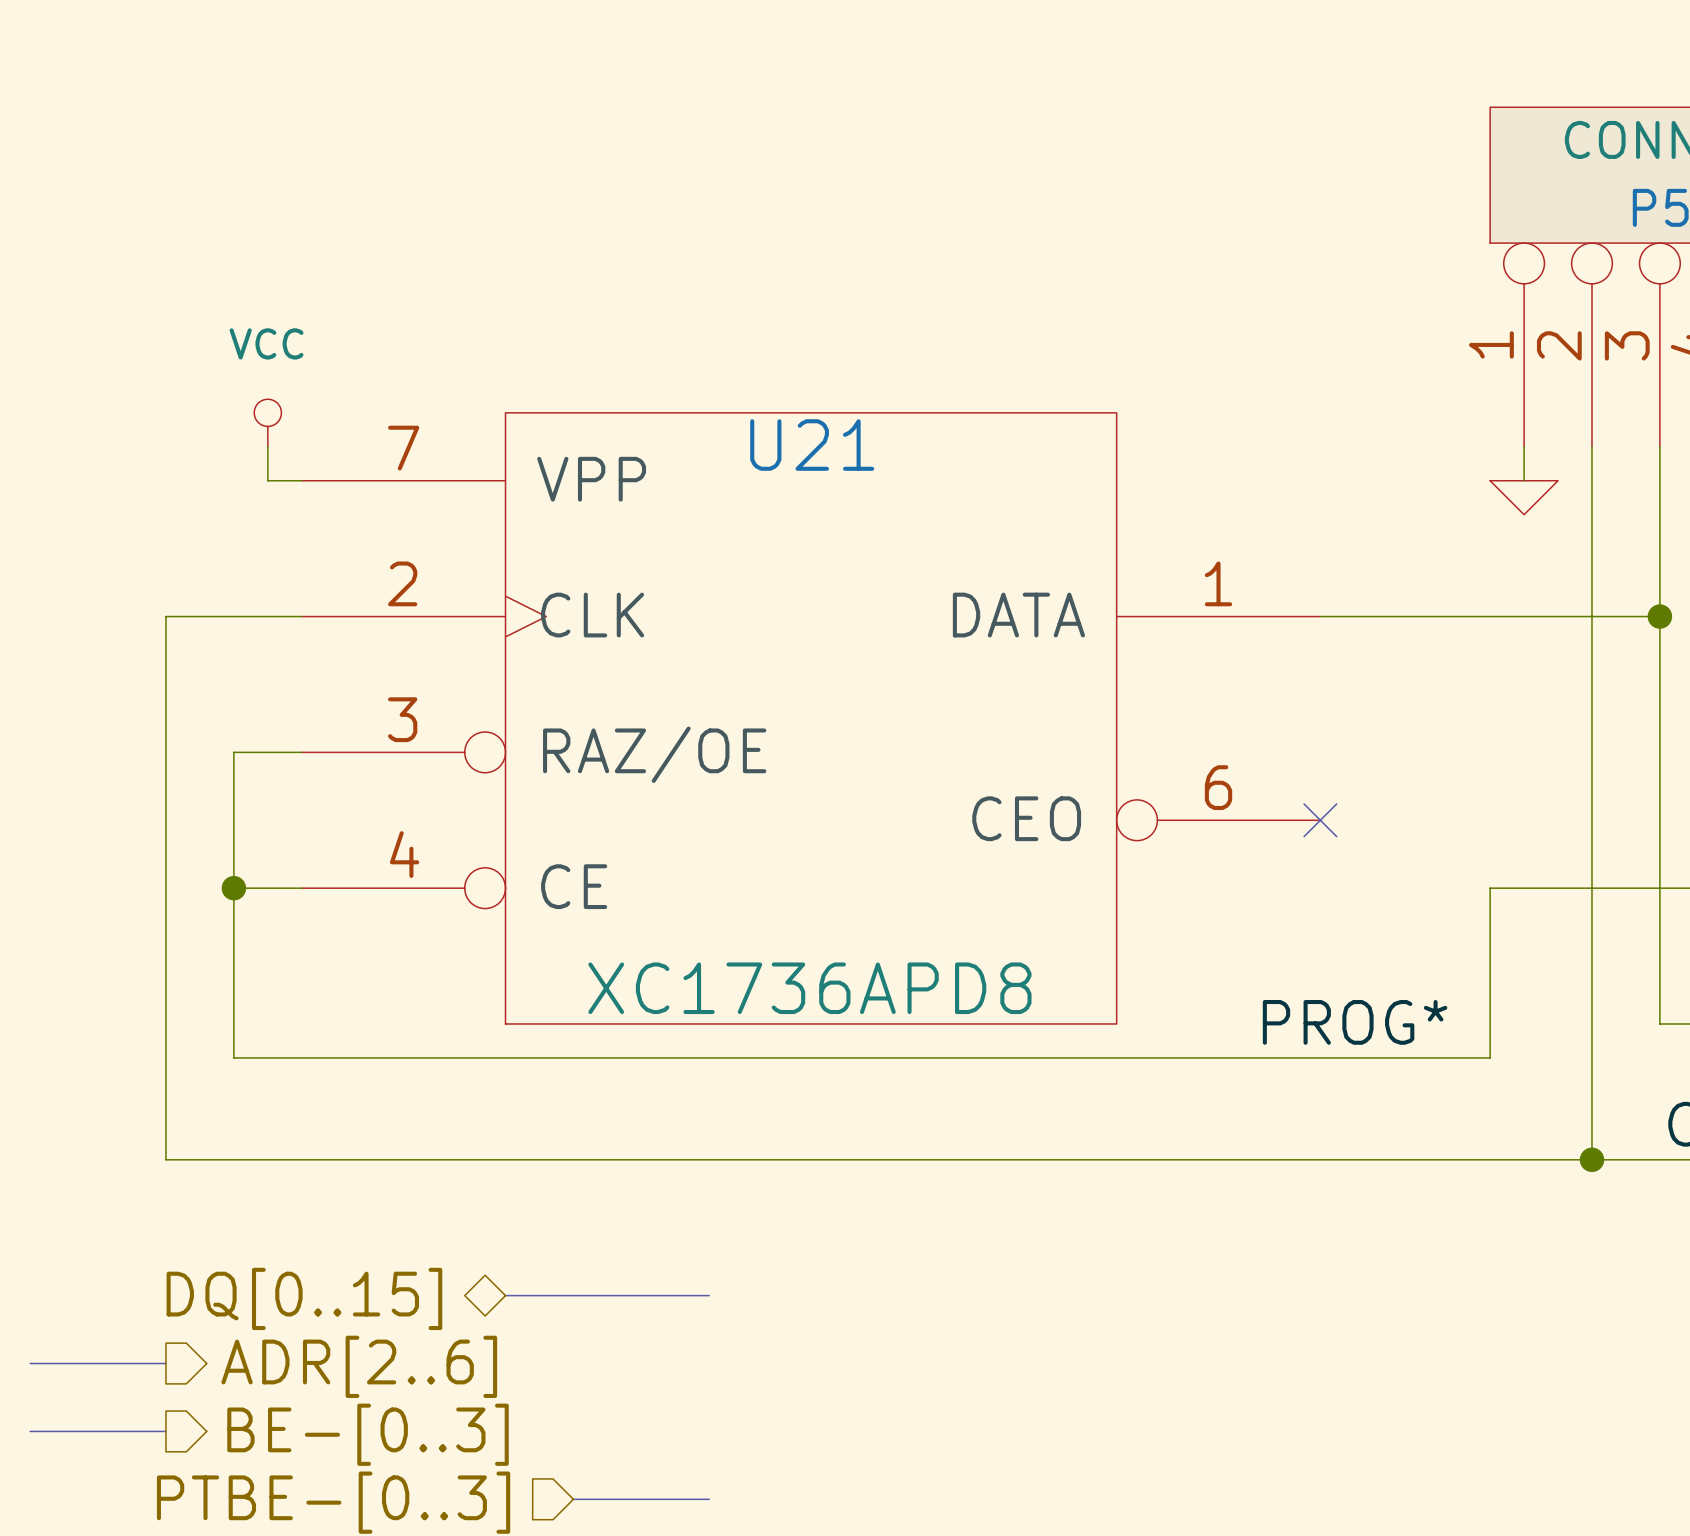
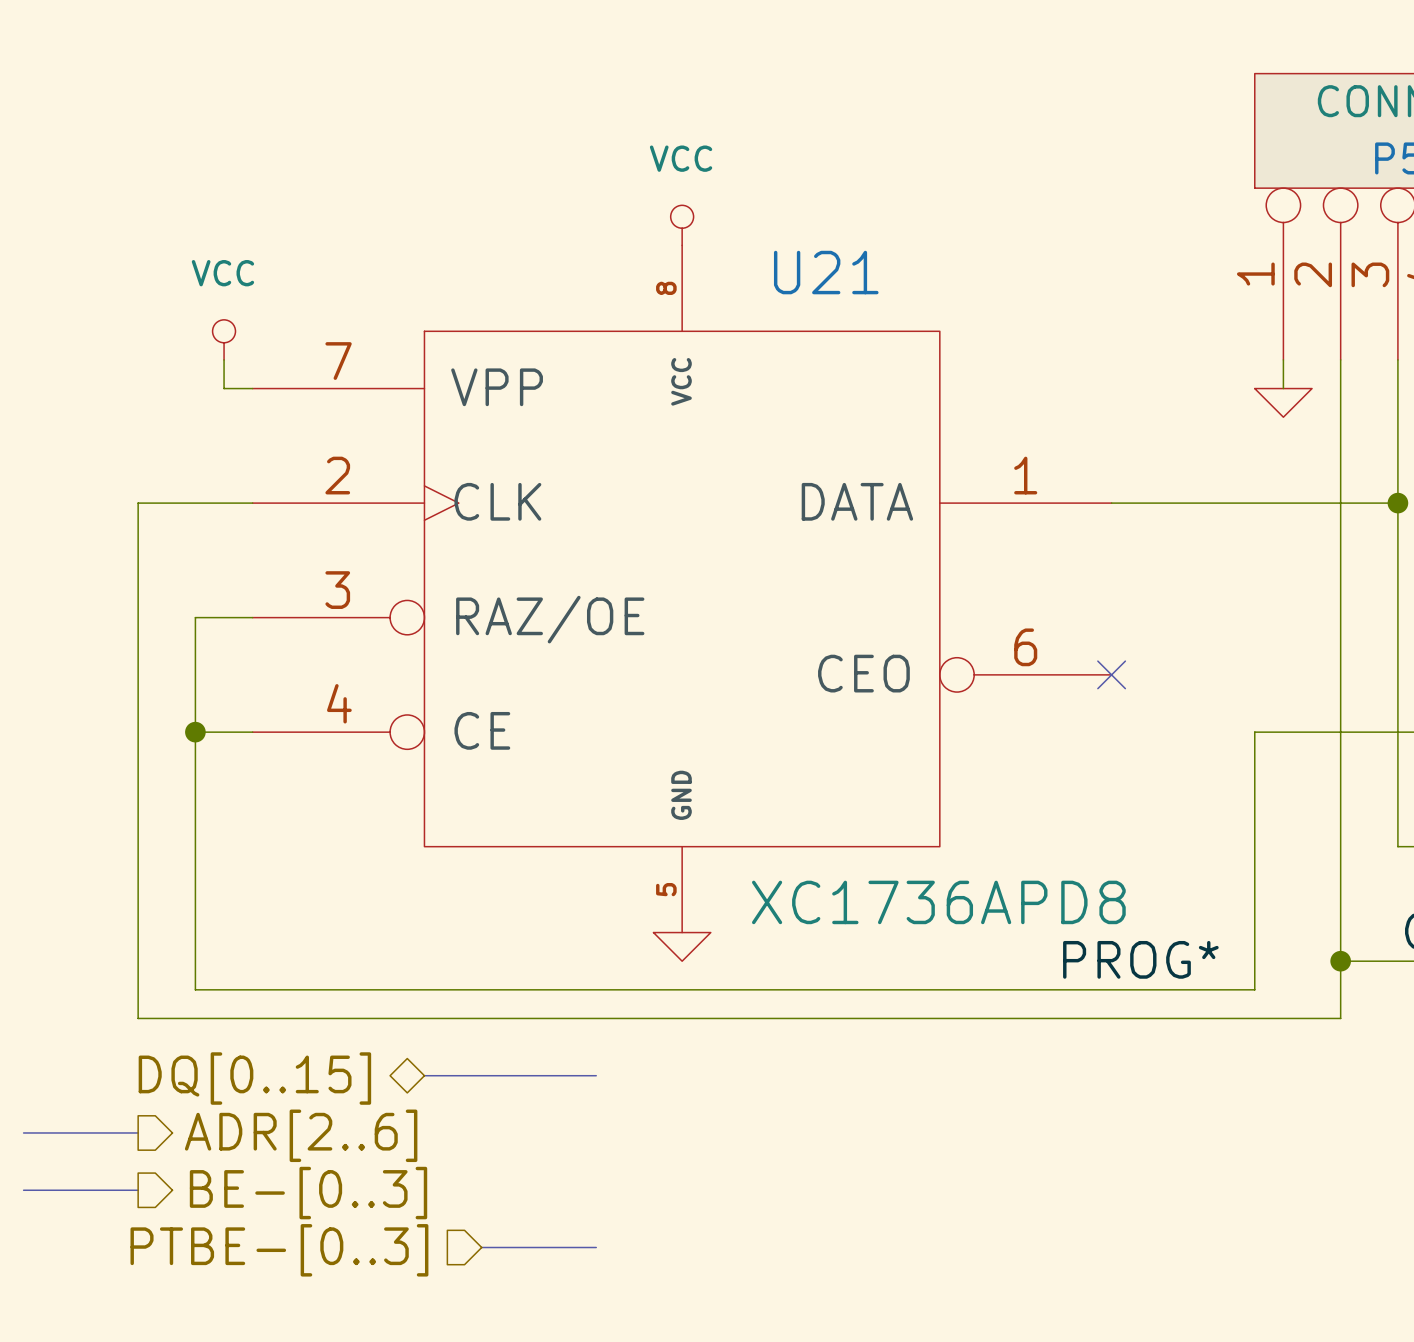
power symbol: none -> VCC (682, 225)
U21 symbol: [301, 412, 1321, 1024] -> [252, 245, 1112, 933]
U21 name position: U21 (812, 445) -> U21 (826, 272)
U21 value position: XC1736APD8 (809, 988) -> XC1736APD8 (938, 902)
label position: PROG* (1355, 1022) -> PROG* (1140, 959)
wire: (233, 1057) (1490, 1057) -> (195, 875) (195, 989) (1254, 989) (1254, 875)
power symbol: none -> (682, 946)
wire: (165, 1159) (1591, 1159) -> (138, 961) (138, 1018) (1340, 1018) (1340, 961)

